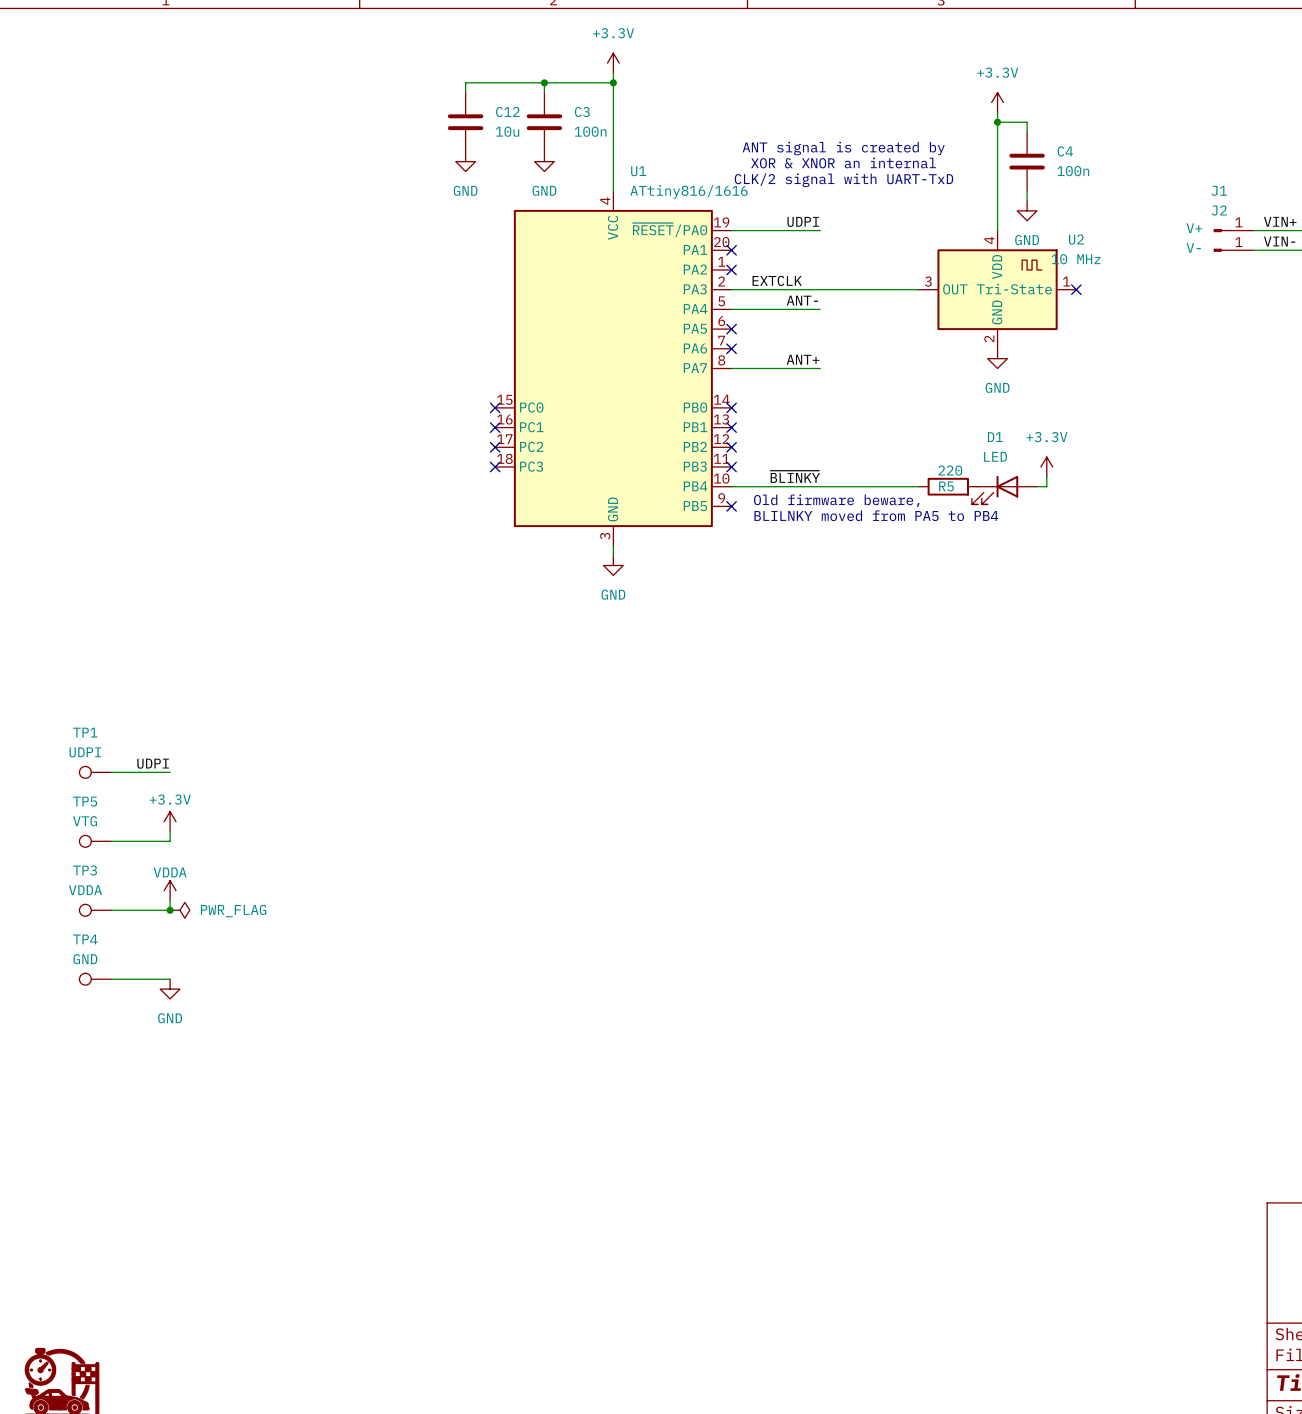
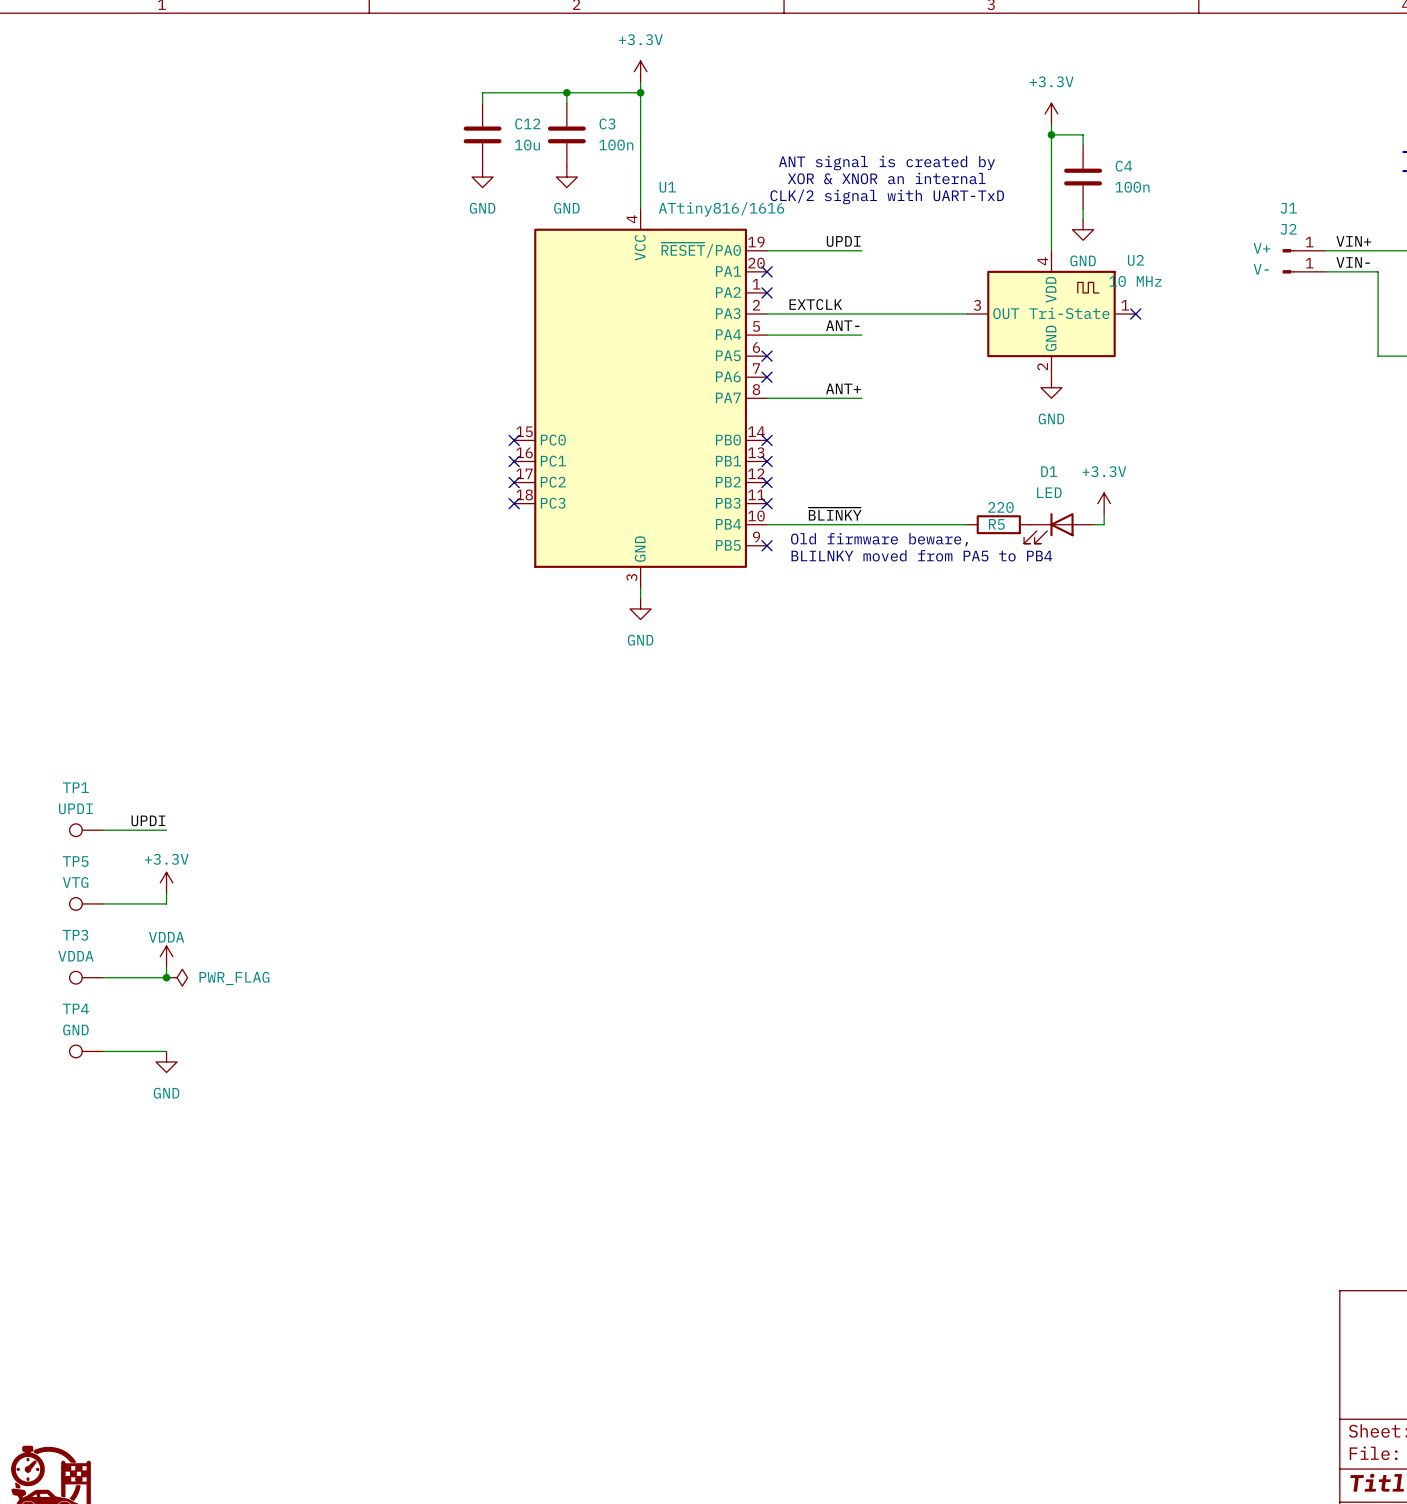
label: UDPI (803, 221) -> UPDI (843, 241)
TP1 value: UDPI (85, 752) -> UPDI (75, 808)
label: UDPI (153, 763) -> UPDI (148, 820)

